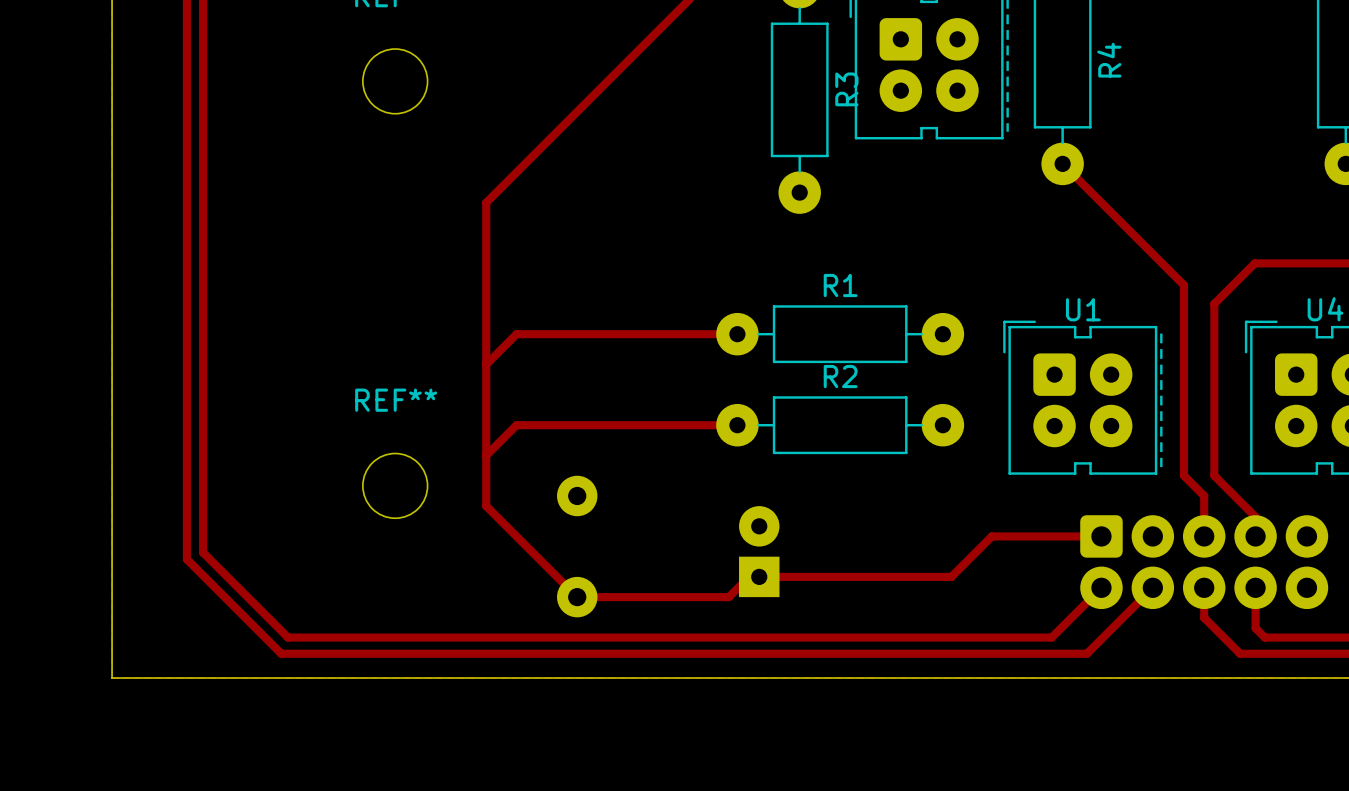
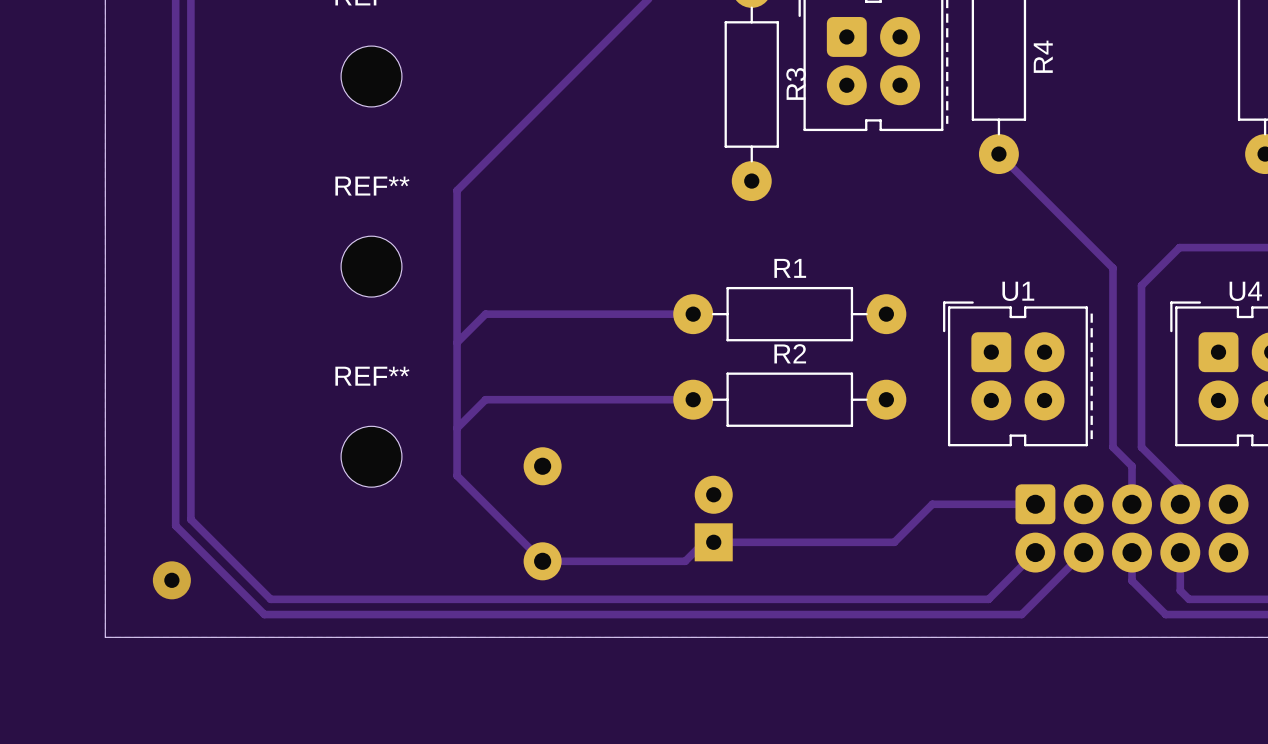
REF**: none -> (371, 266)
via: none -> (171, 580)

